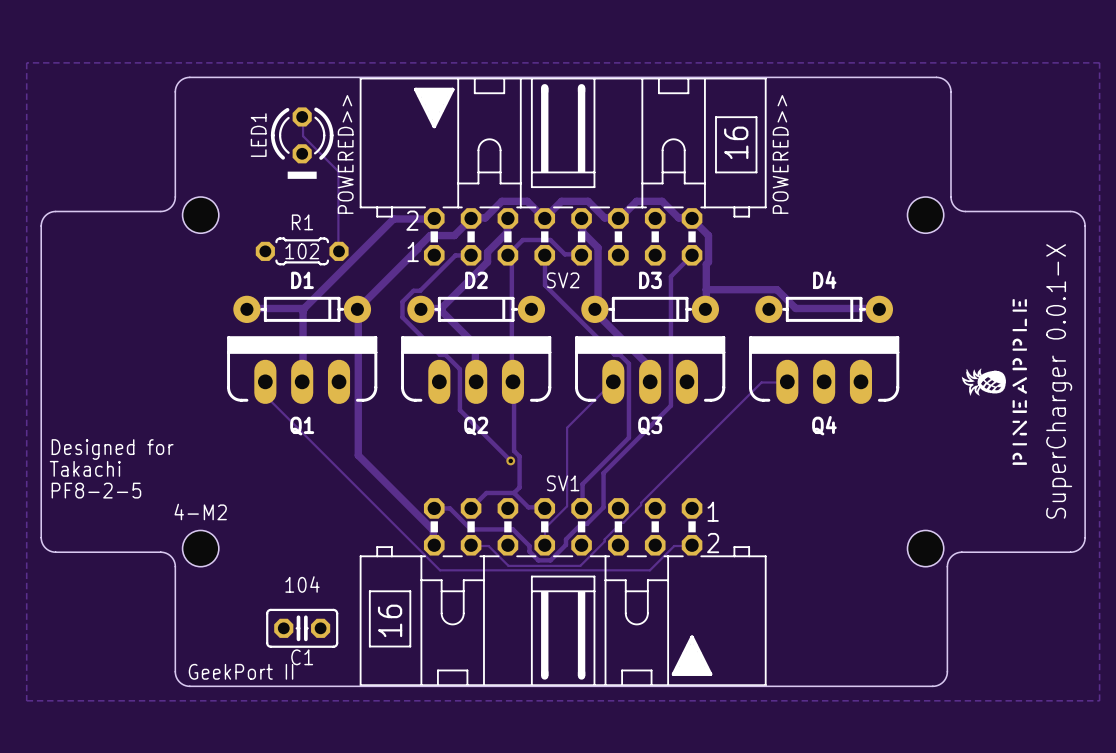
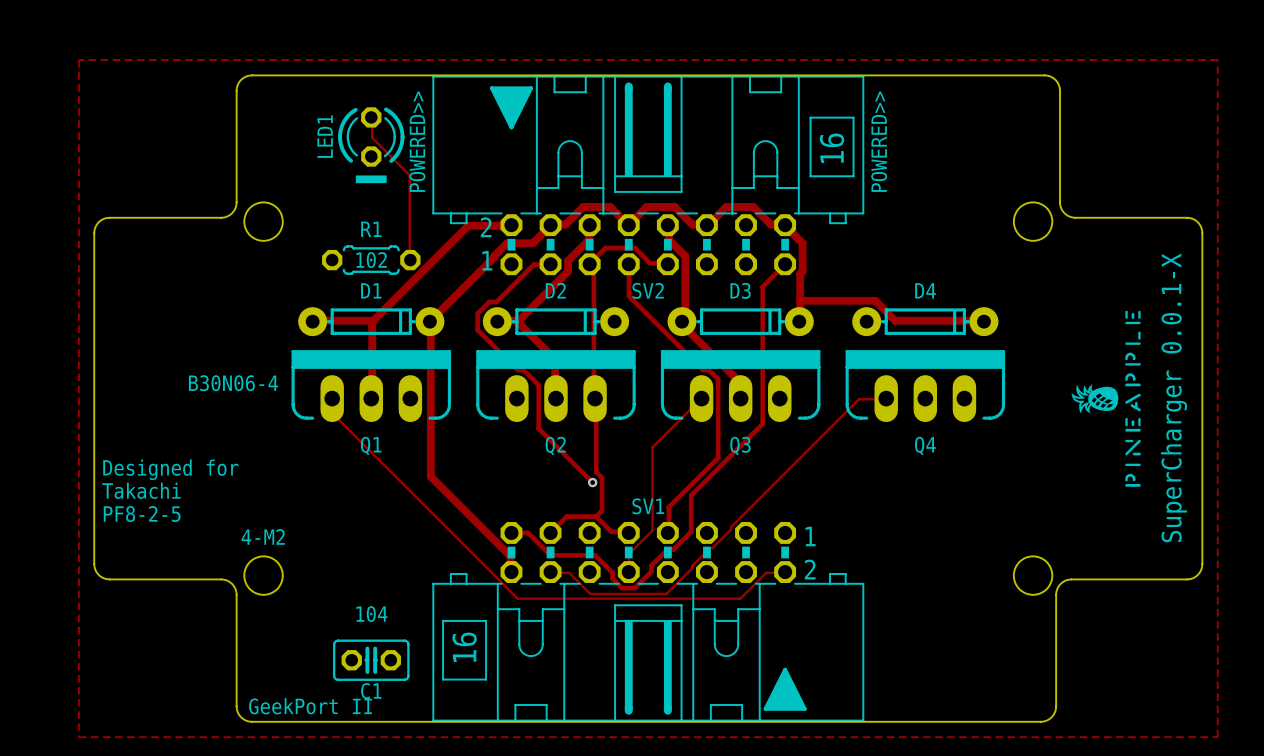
text: none -> B30N06-4 (233, 383)

